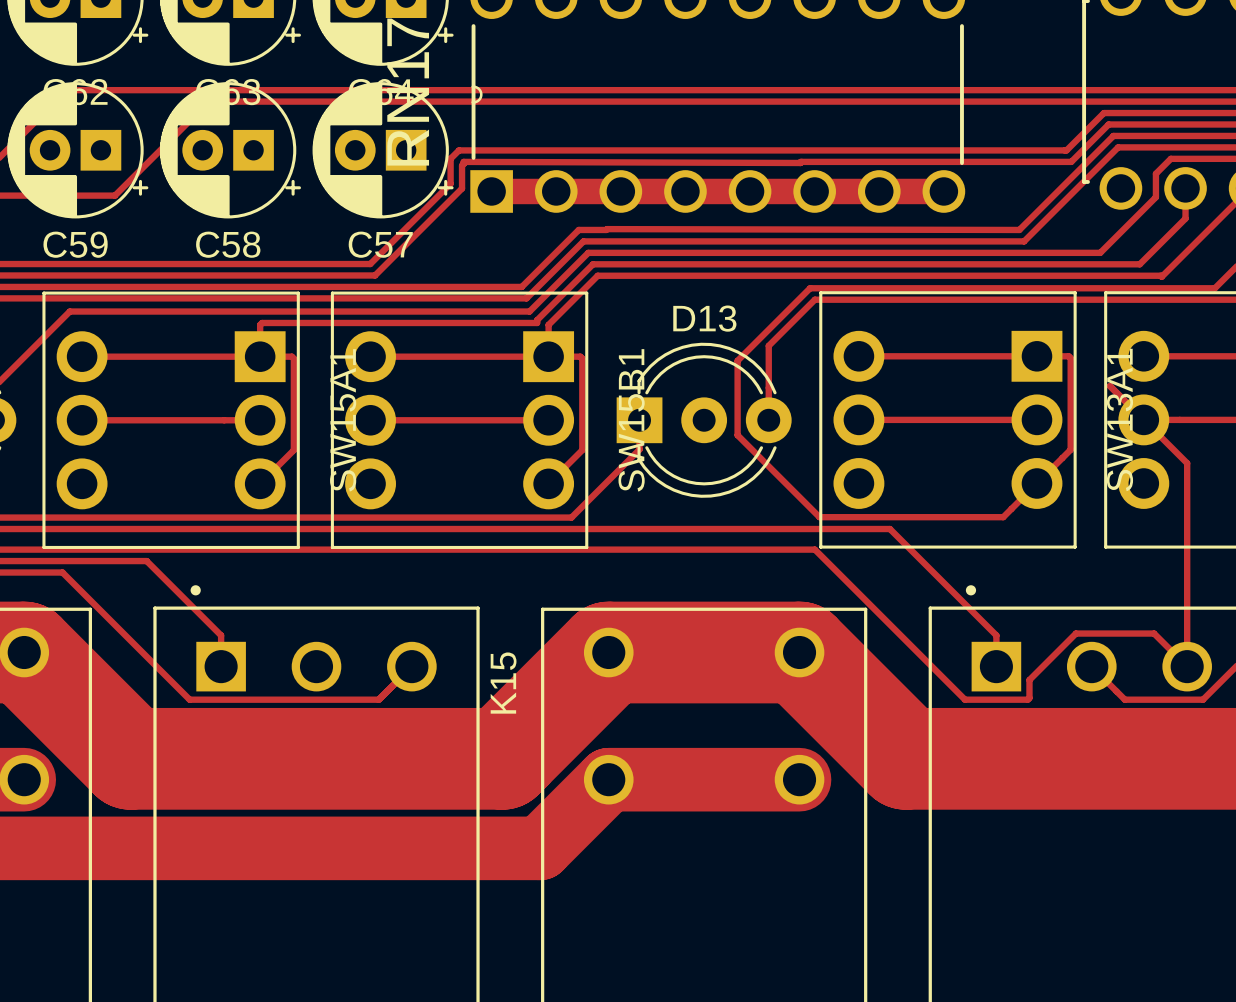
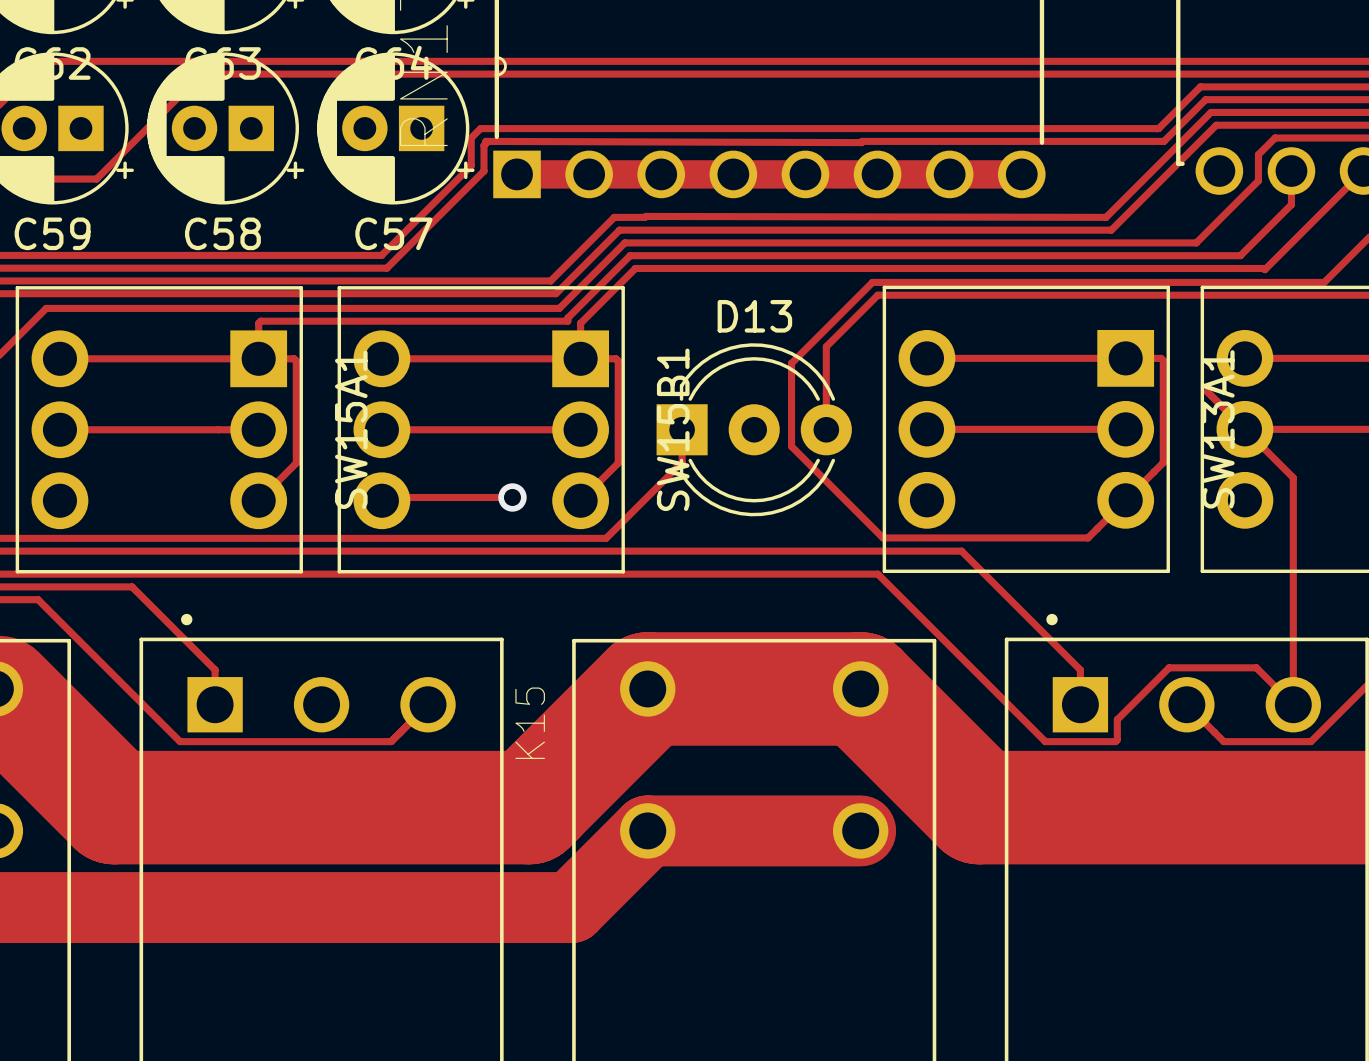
track: none -> (512, 497) (385, 497) (381, 500)
via: none -> (512, 497)

